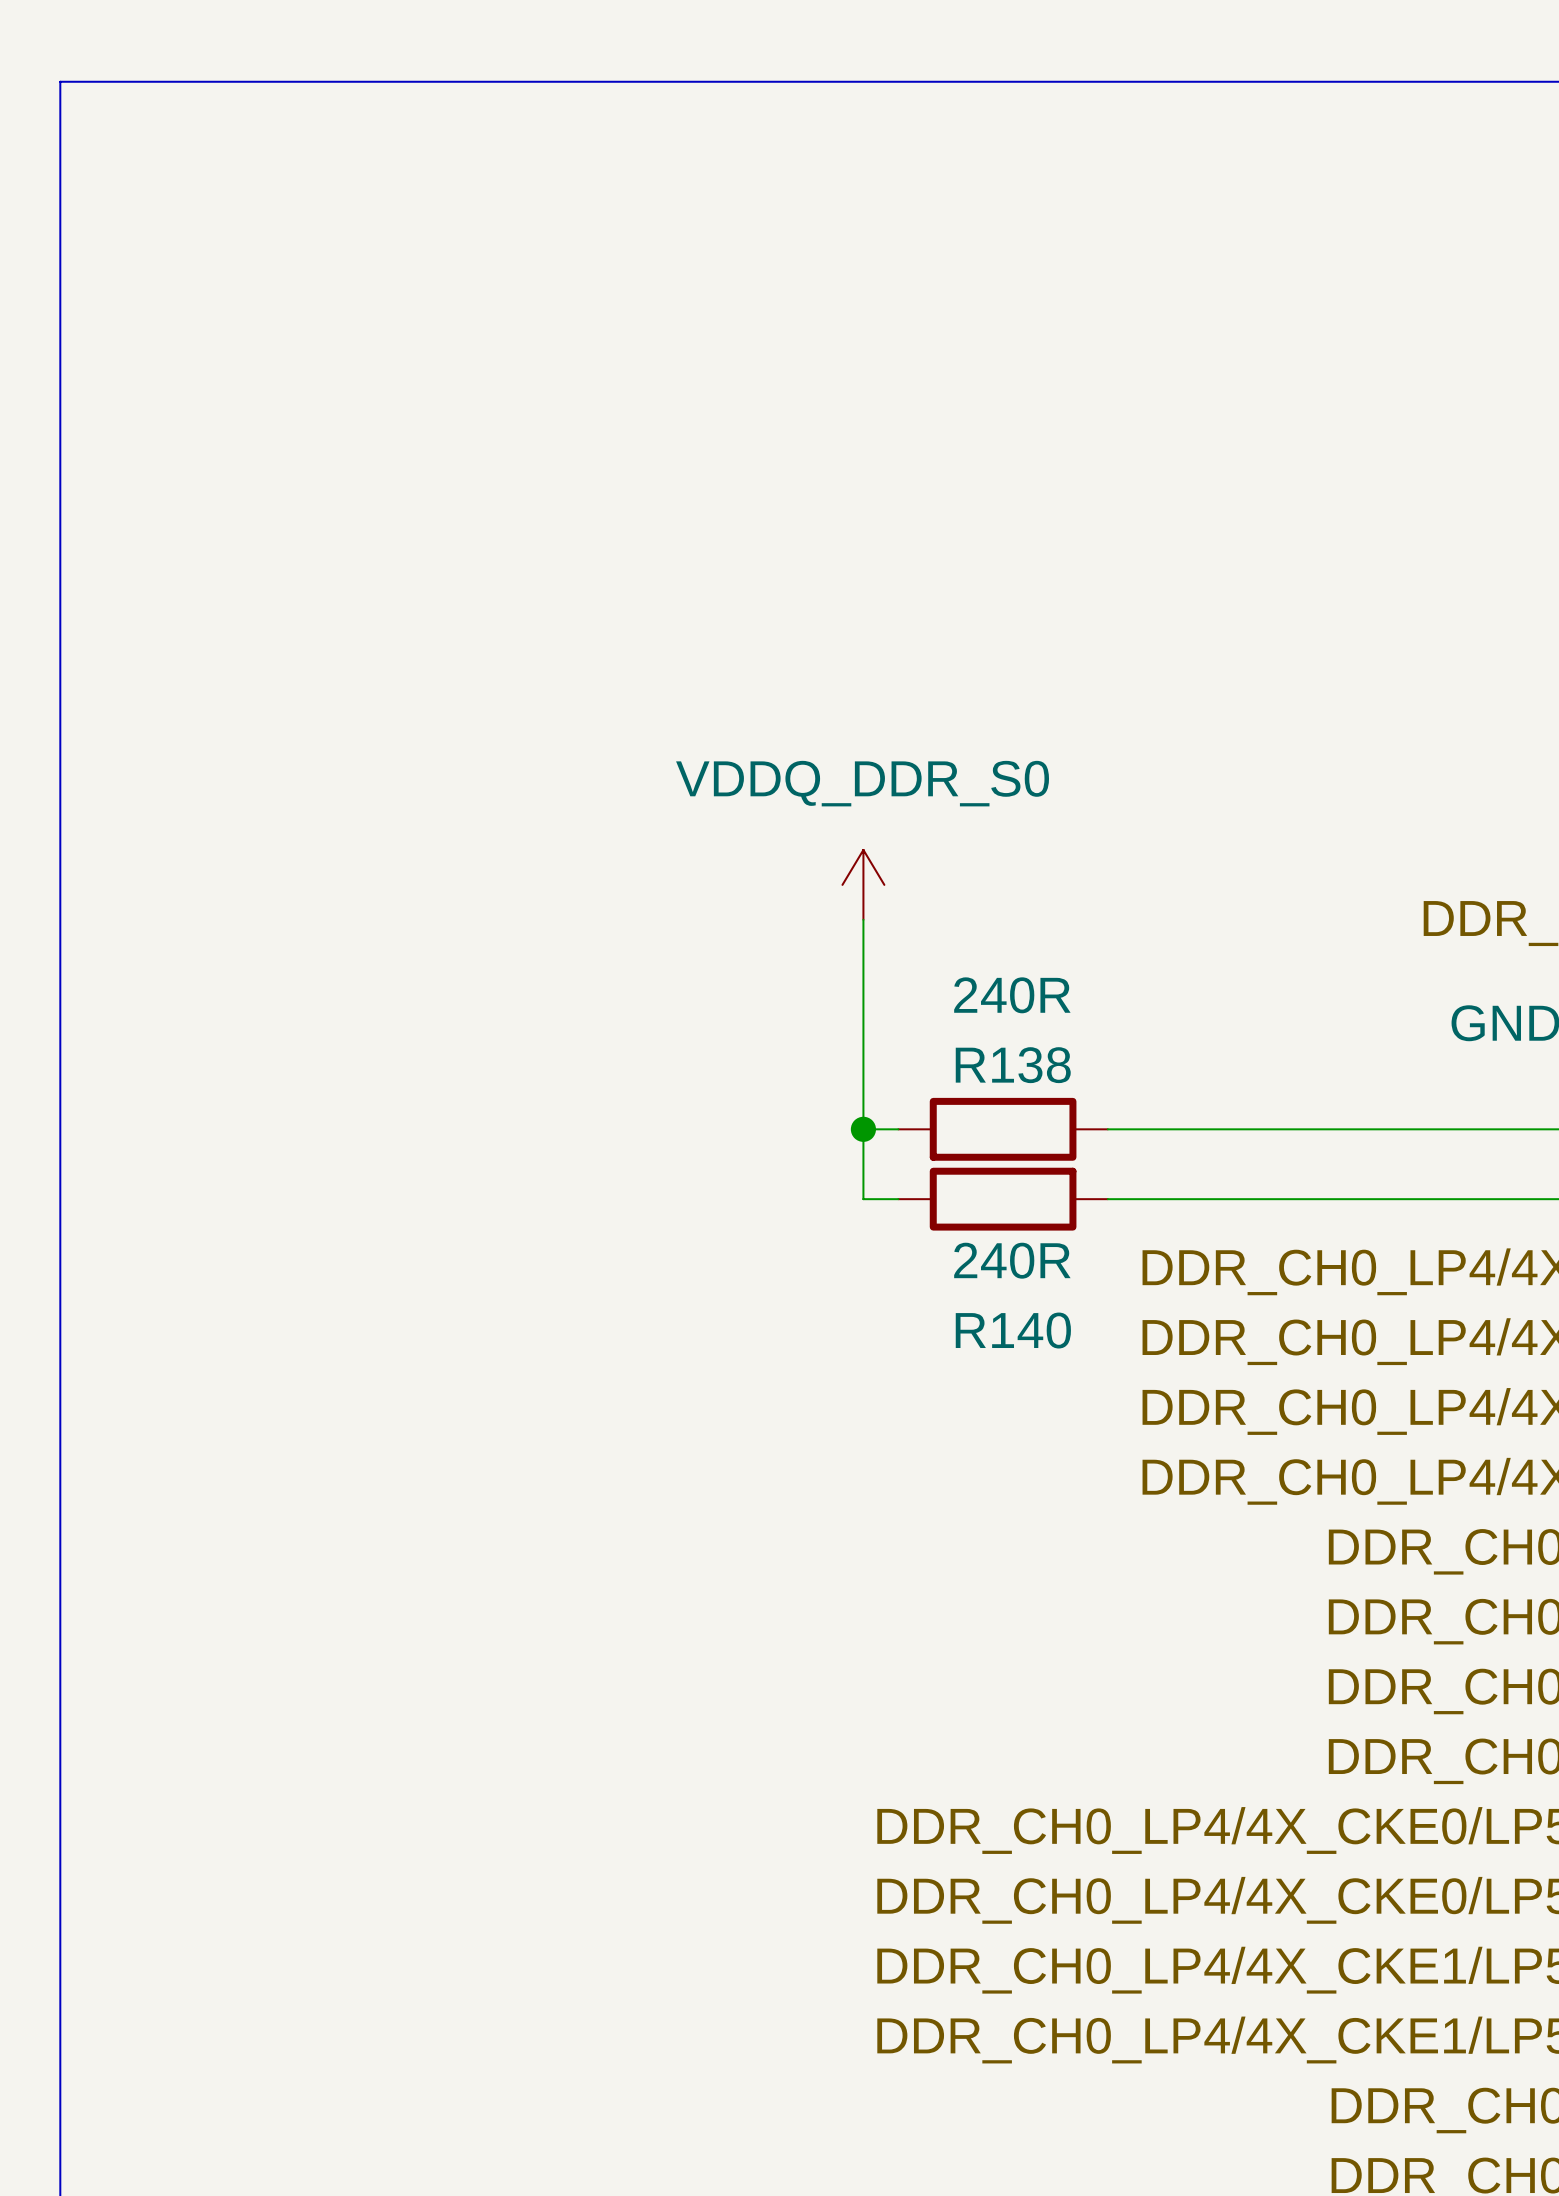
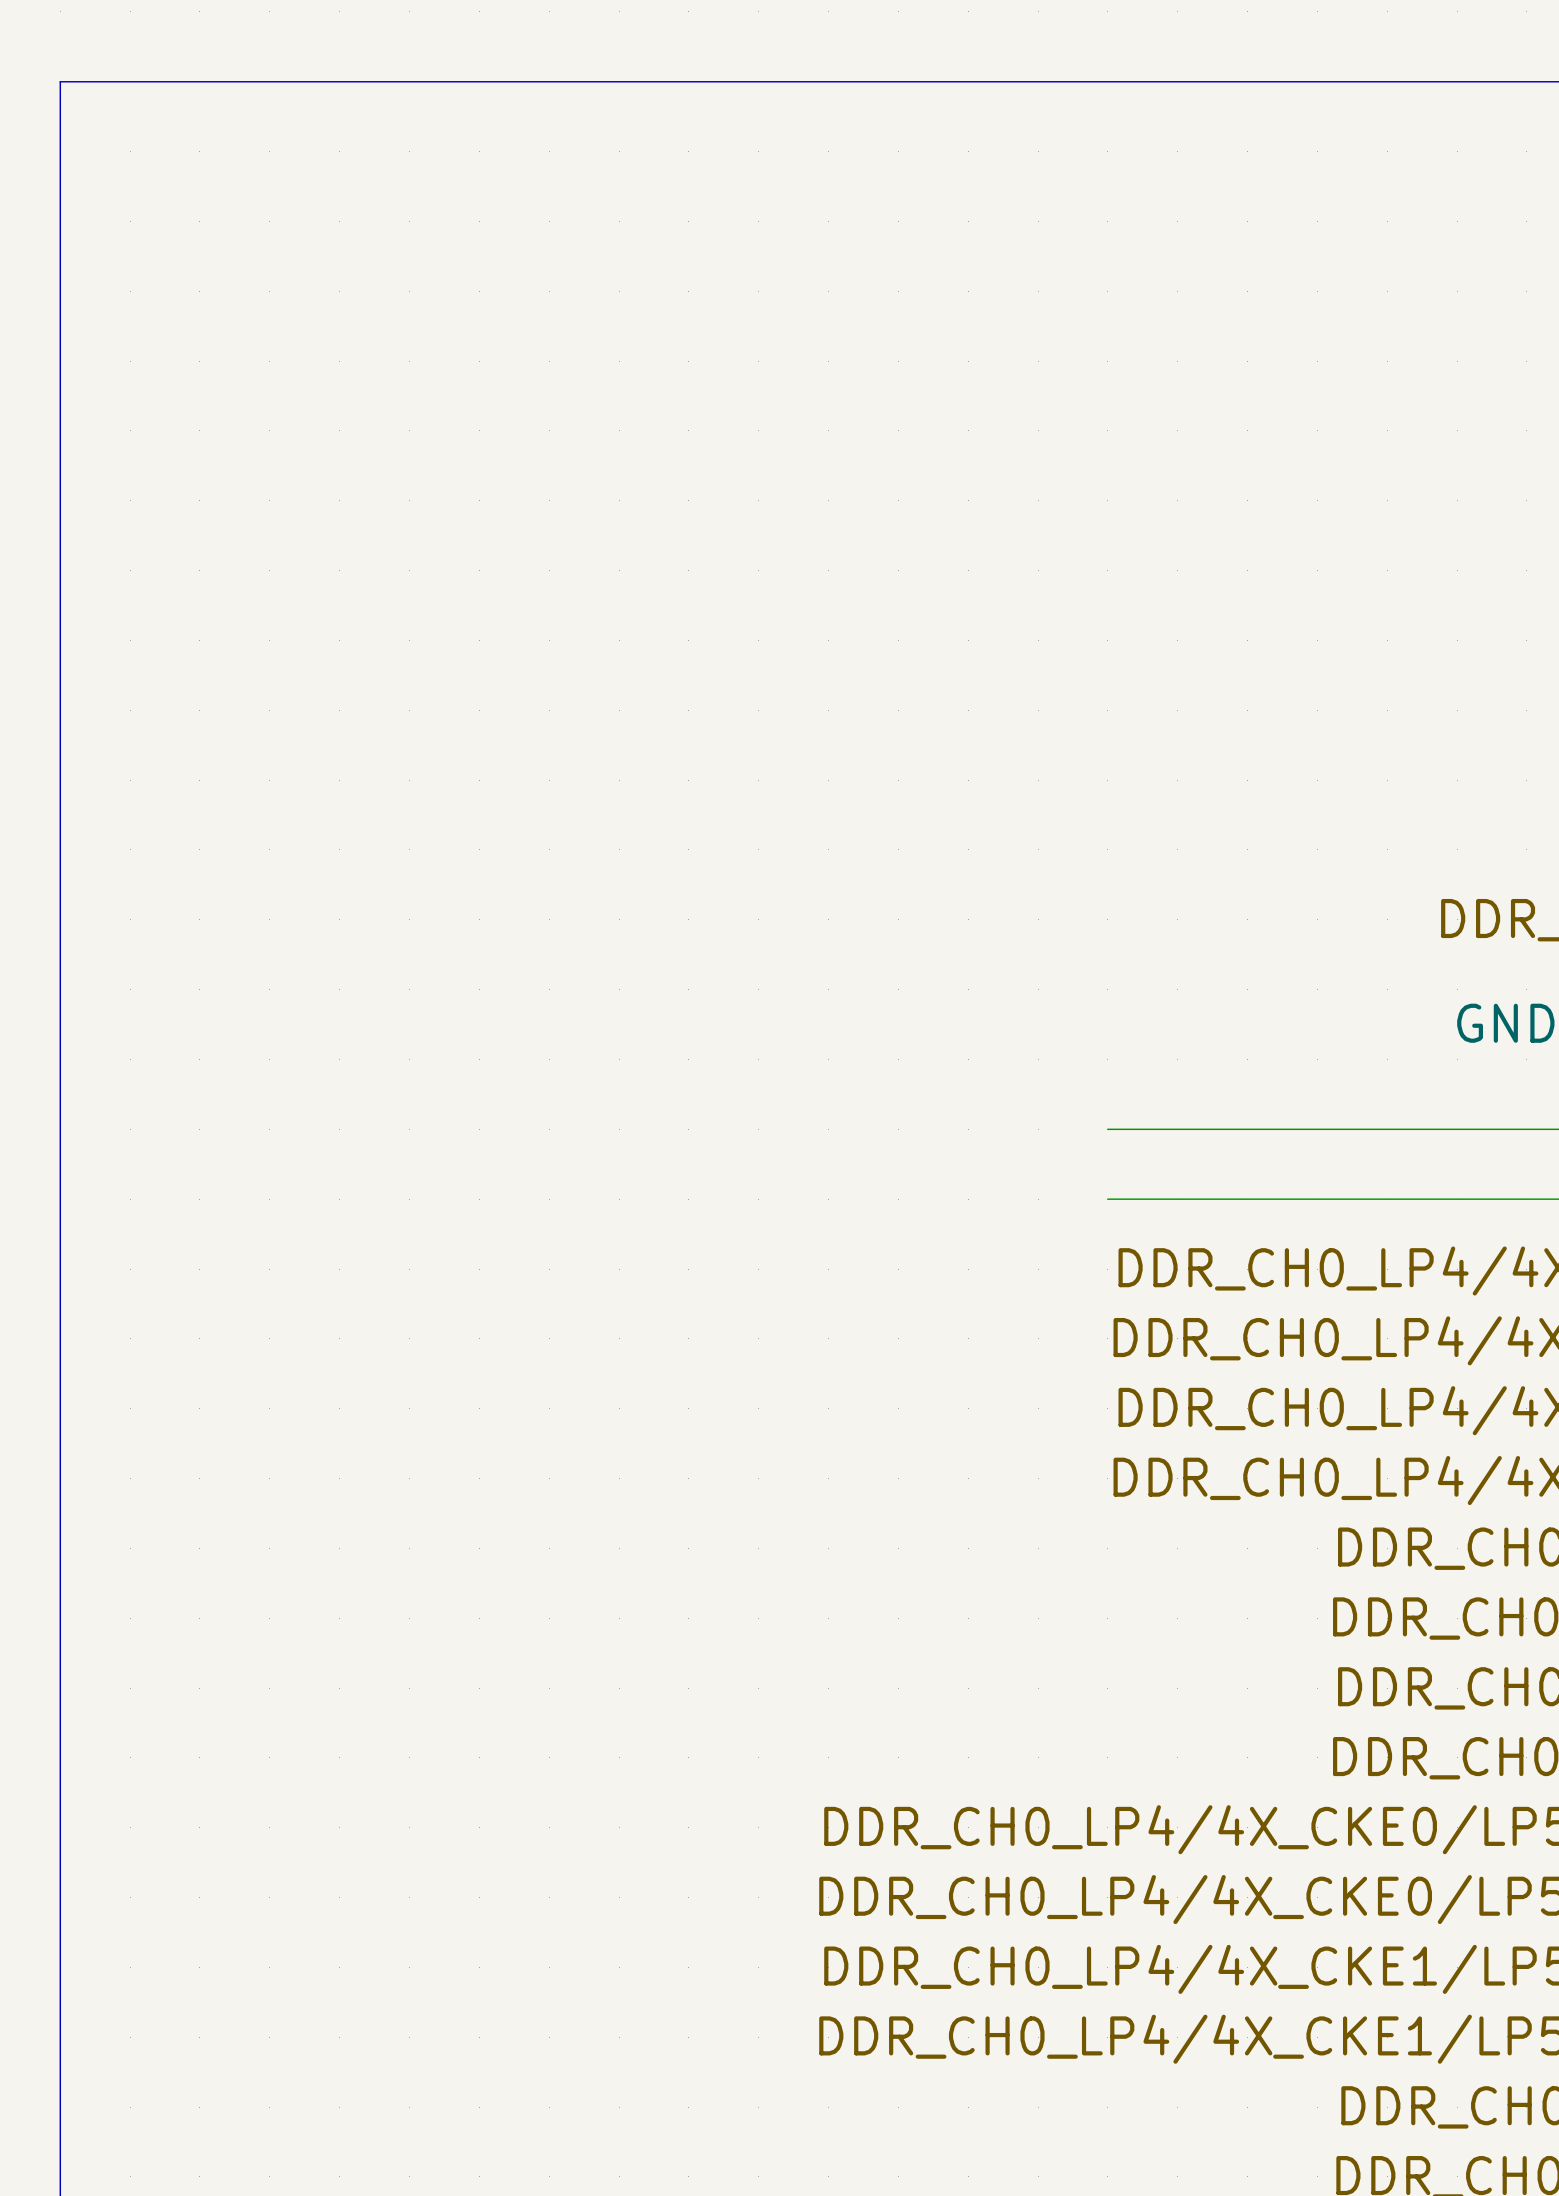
power symbol: VDDQ_DDR_S0 (863, 884) -> none
wire: (863, 919) (863, 1199) (898, 1199) -> none
wire: (863, 1129) (898, 1129) -> none
junction: (863, 1129) -> none
R138: 240R (1003, 1129) -> none
R140: 240R (1003, 1199) -> none

